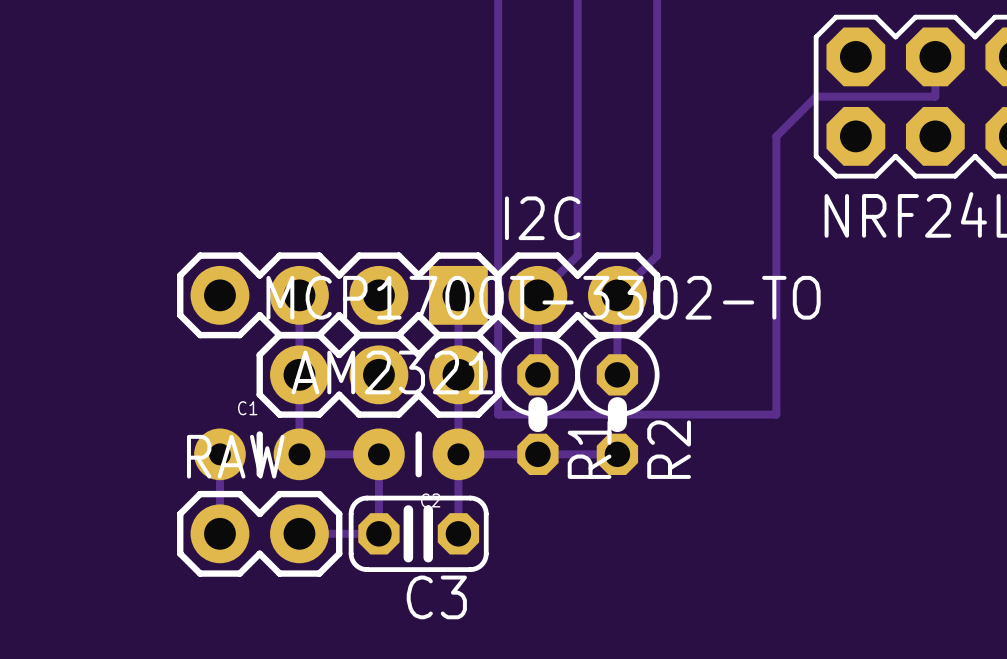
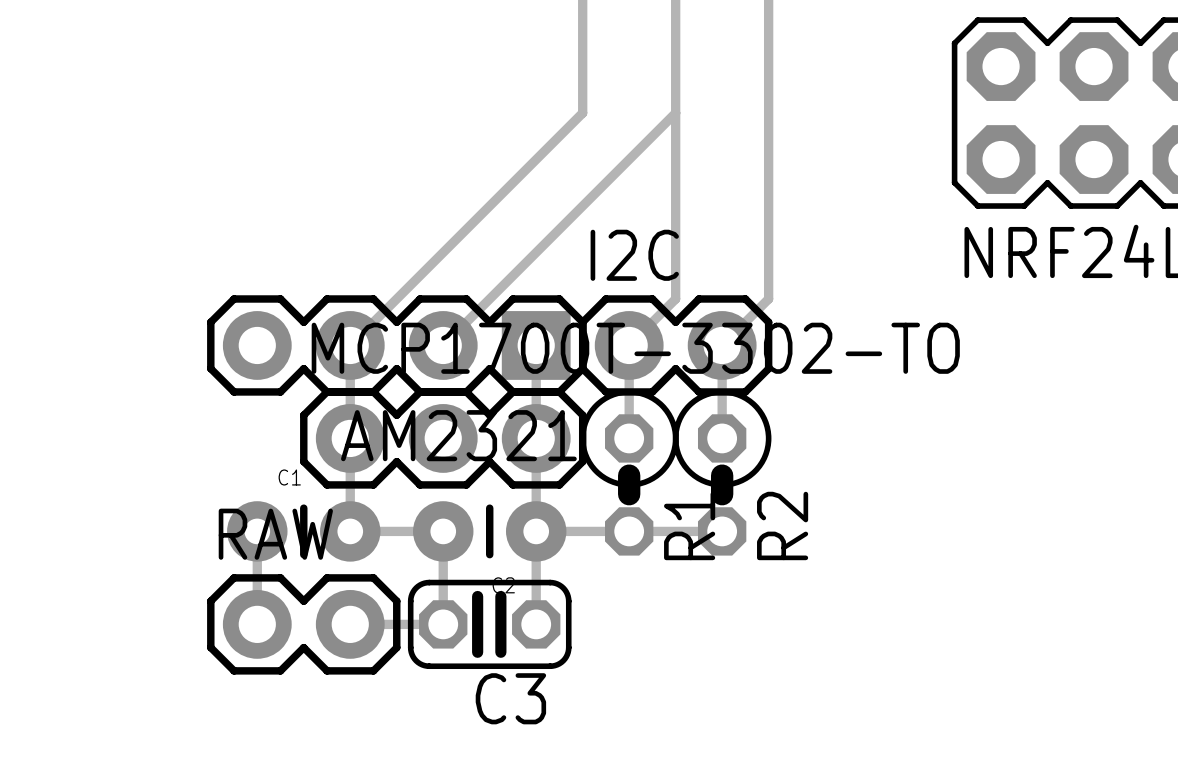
track: (935, 56) (935, 96) (816, 96) (776, 136) (776, 414) (498, 414) (498, 96) -> (350, 345) (582, 113)
track: none -> (675, 113) (443, 345)

